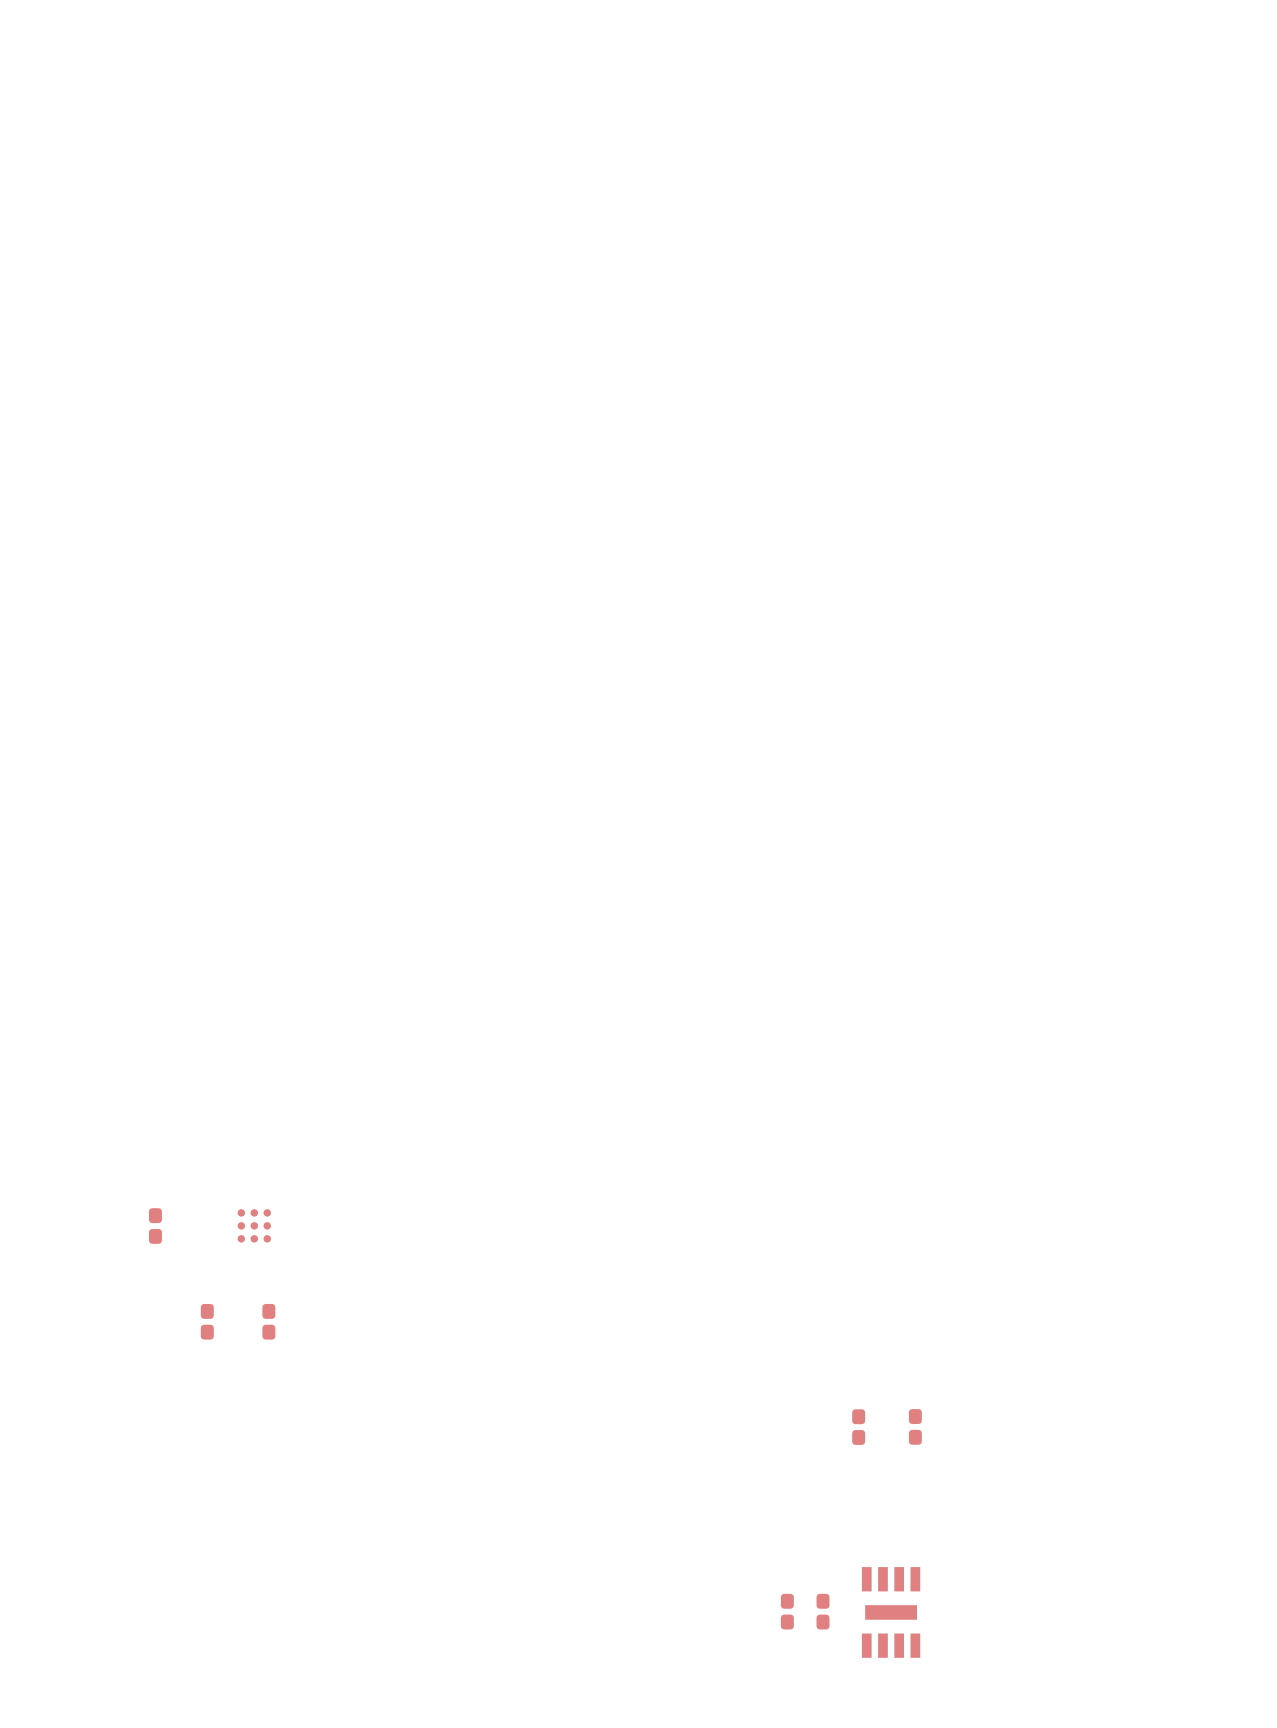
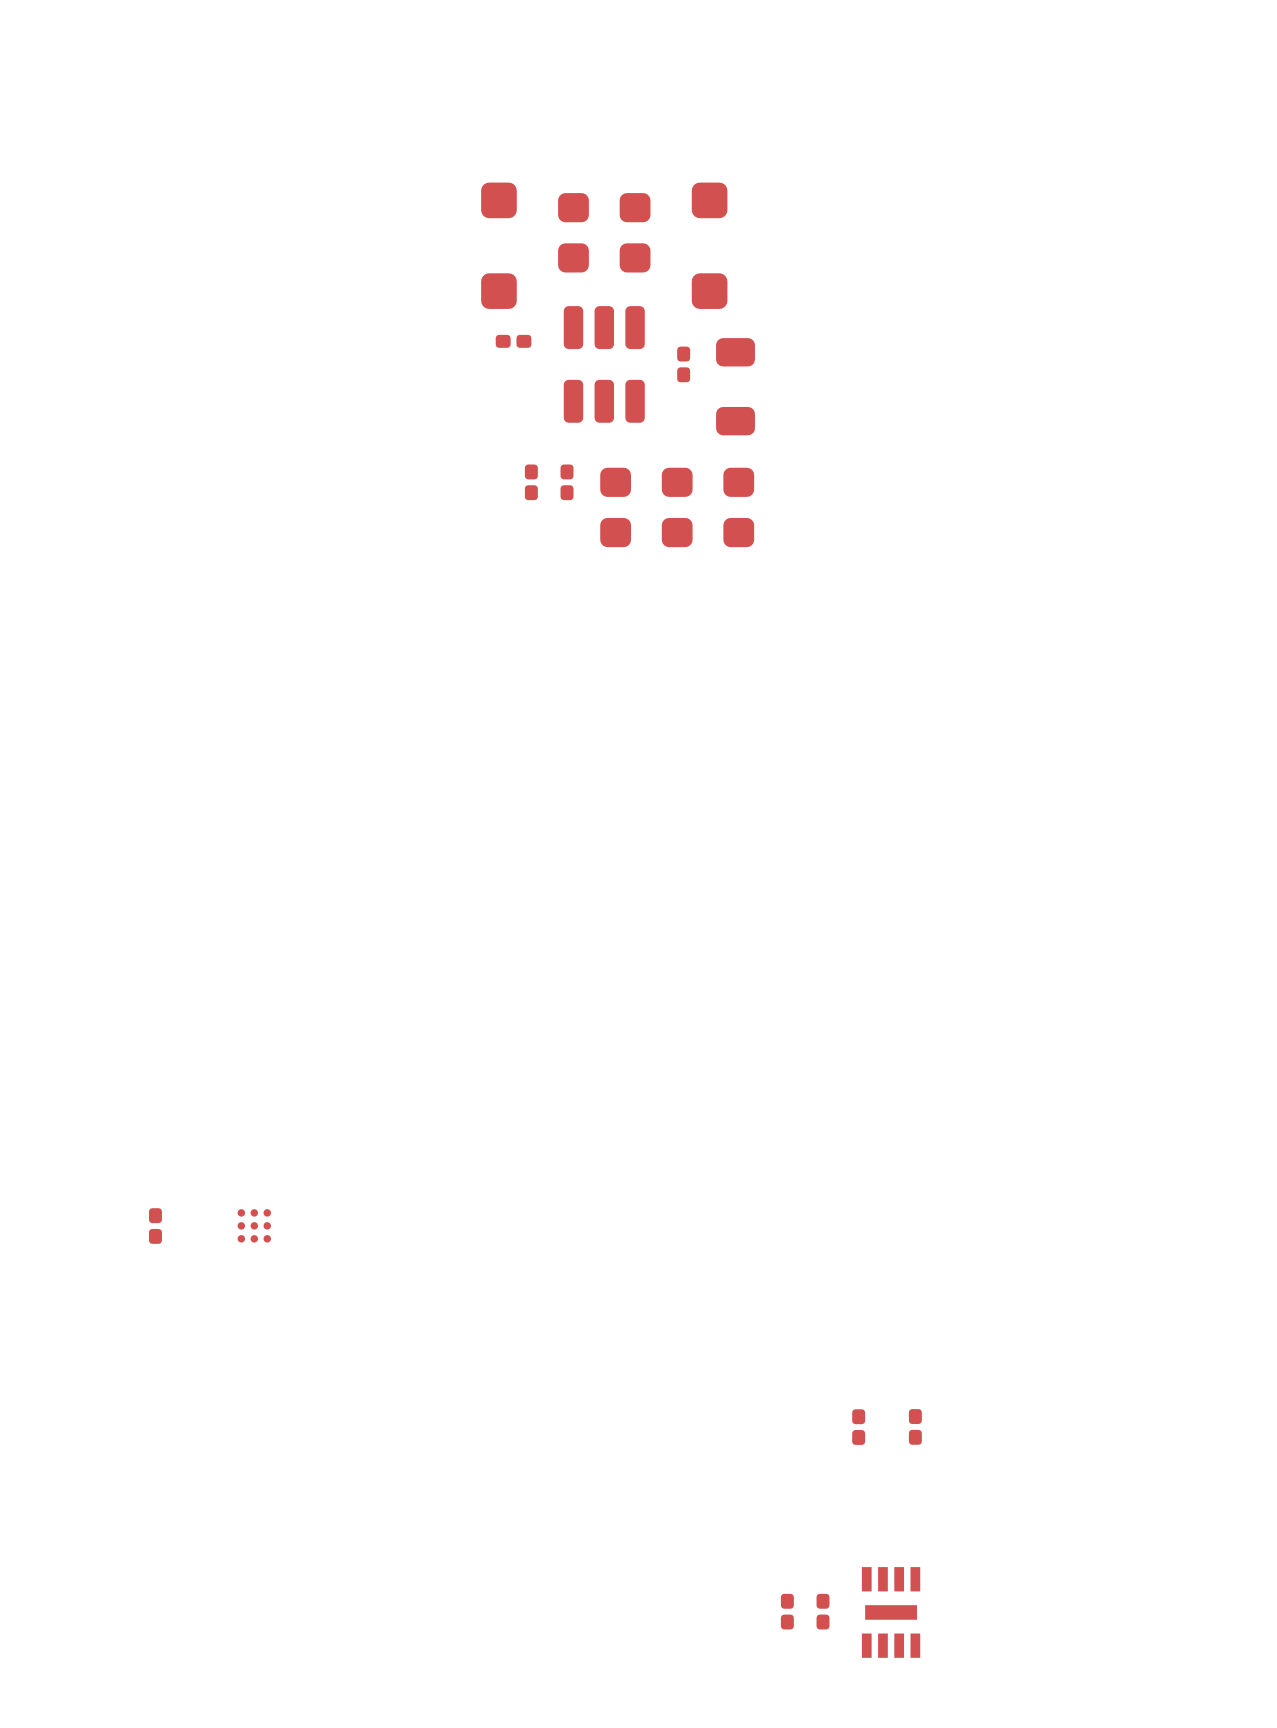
part: none -> (573, 232)
part: none -> (635, 232)
part: none -> (498, 245)
part: none -> (709, 245)
part: none -> (513, 341)
part: none -> (604, 364)
part: none -> (683, 364)
part: none -> (735, 386)
part: none -> (531, 482)
part: none -> (567, 482)
part: none -> (615, 507)
part: none -> (677, 507)
part: none -> (738, 507)
part: (207, 1321) -> none
part: (268, 1321) -> none

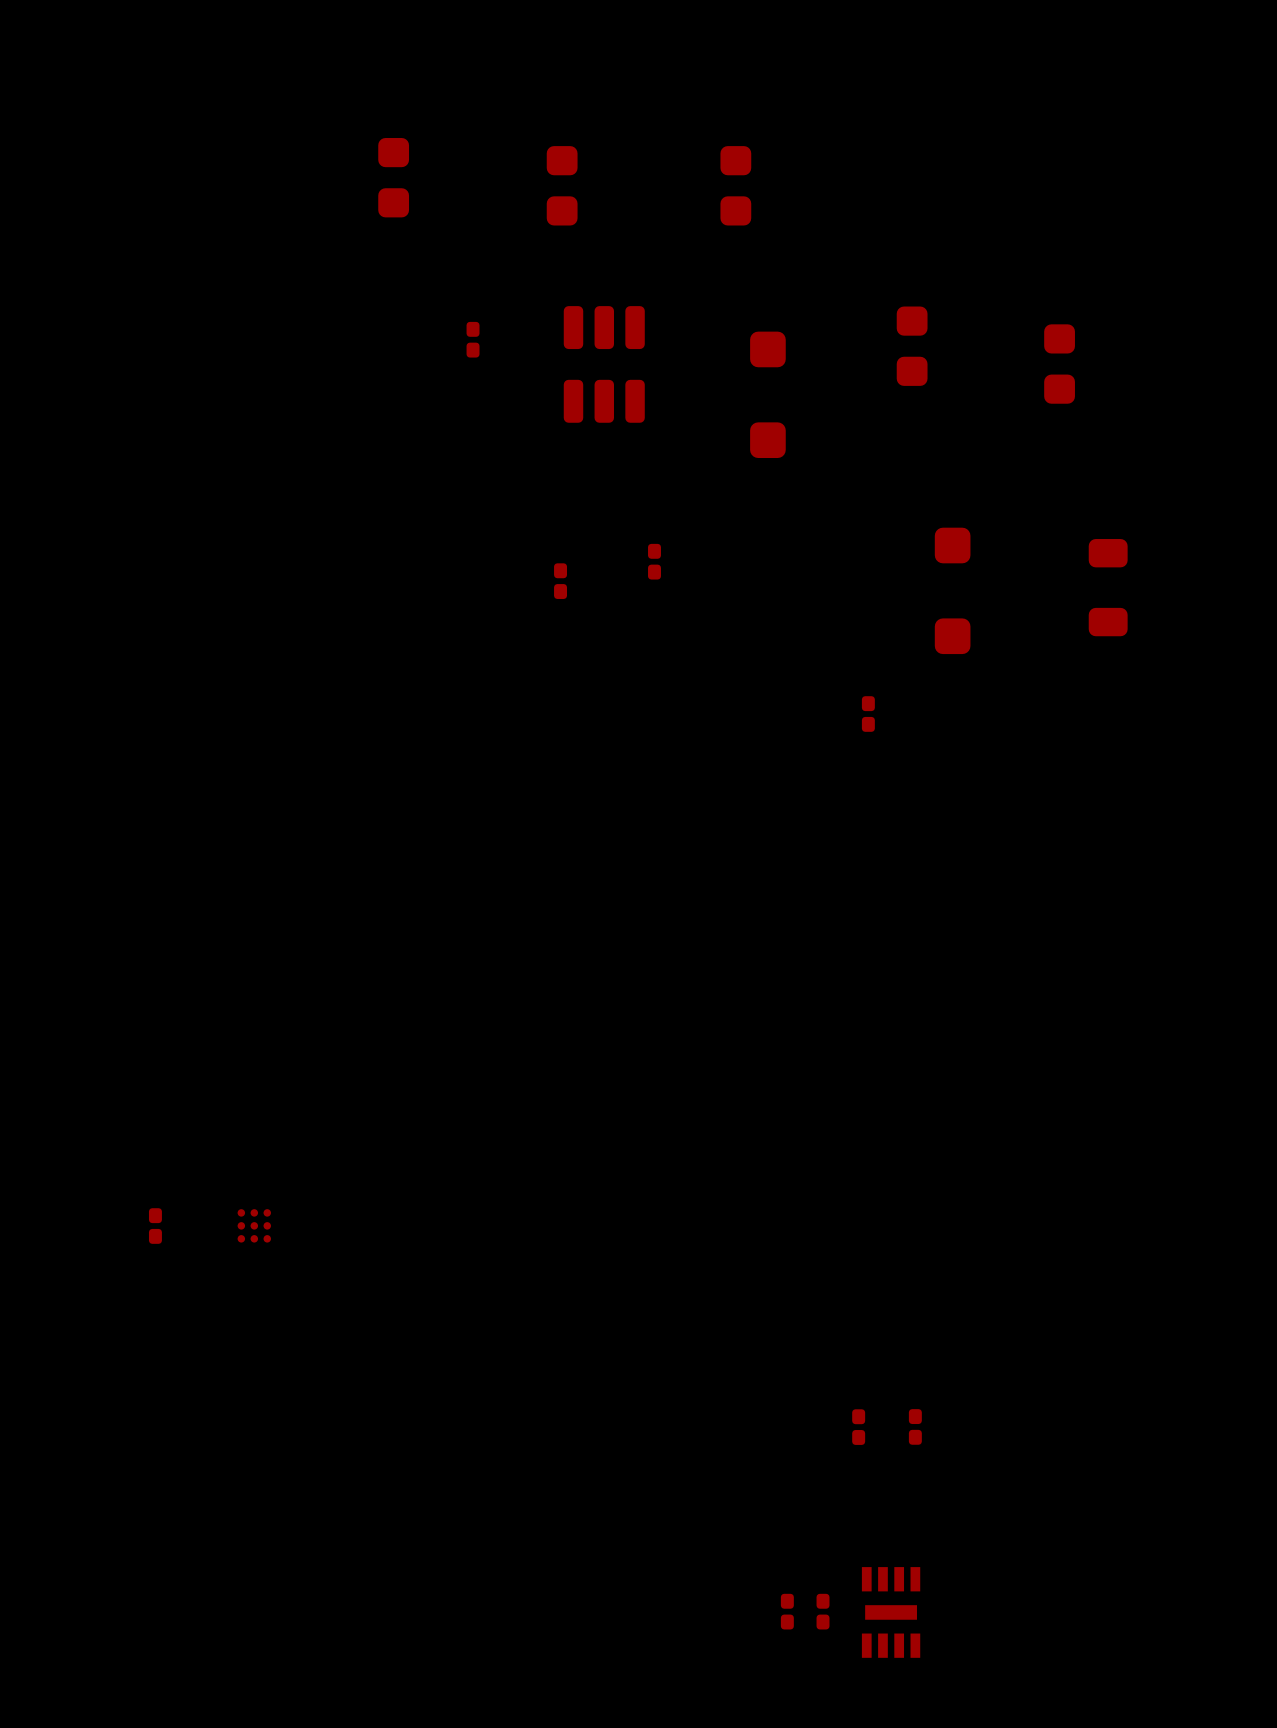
part: none -> (393, 177)
part: none -> (562, 185)
part: none -> (735, 185)
part: (573, 232) -> none
part: (635, 232) -> none
part: (498, 245) -> none
part: (709, 245) -> none
part rotation: 0° (513, 341) -> 90° clockwise (473, 339)
part position: (513, 341) -> (473, 339)
part: none -> (912, 346)
part: (683, 364) -> none
part: none -> (1059, 364)
part position: (735, 386) -> (1108, 587)
part: none -> (767, 394)
part: (531, 482) -> none
part: (567, 482) -> none
part: (615, 507) -> none
part: (677, 507) -> none
part: (738, 507) -> none
part: none -> (654, 561)
part: none -> (560, 581)
part: none -> (952, 590)
part: none -> (868, 714)

